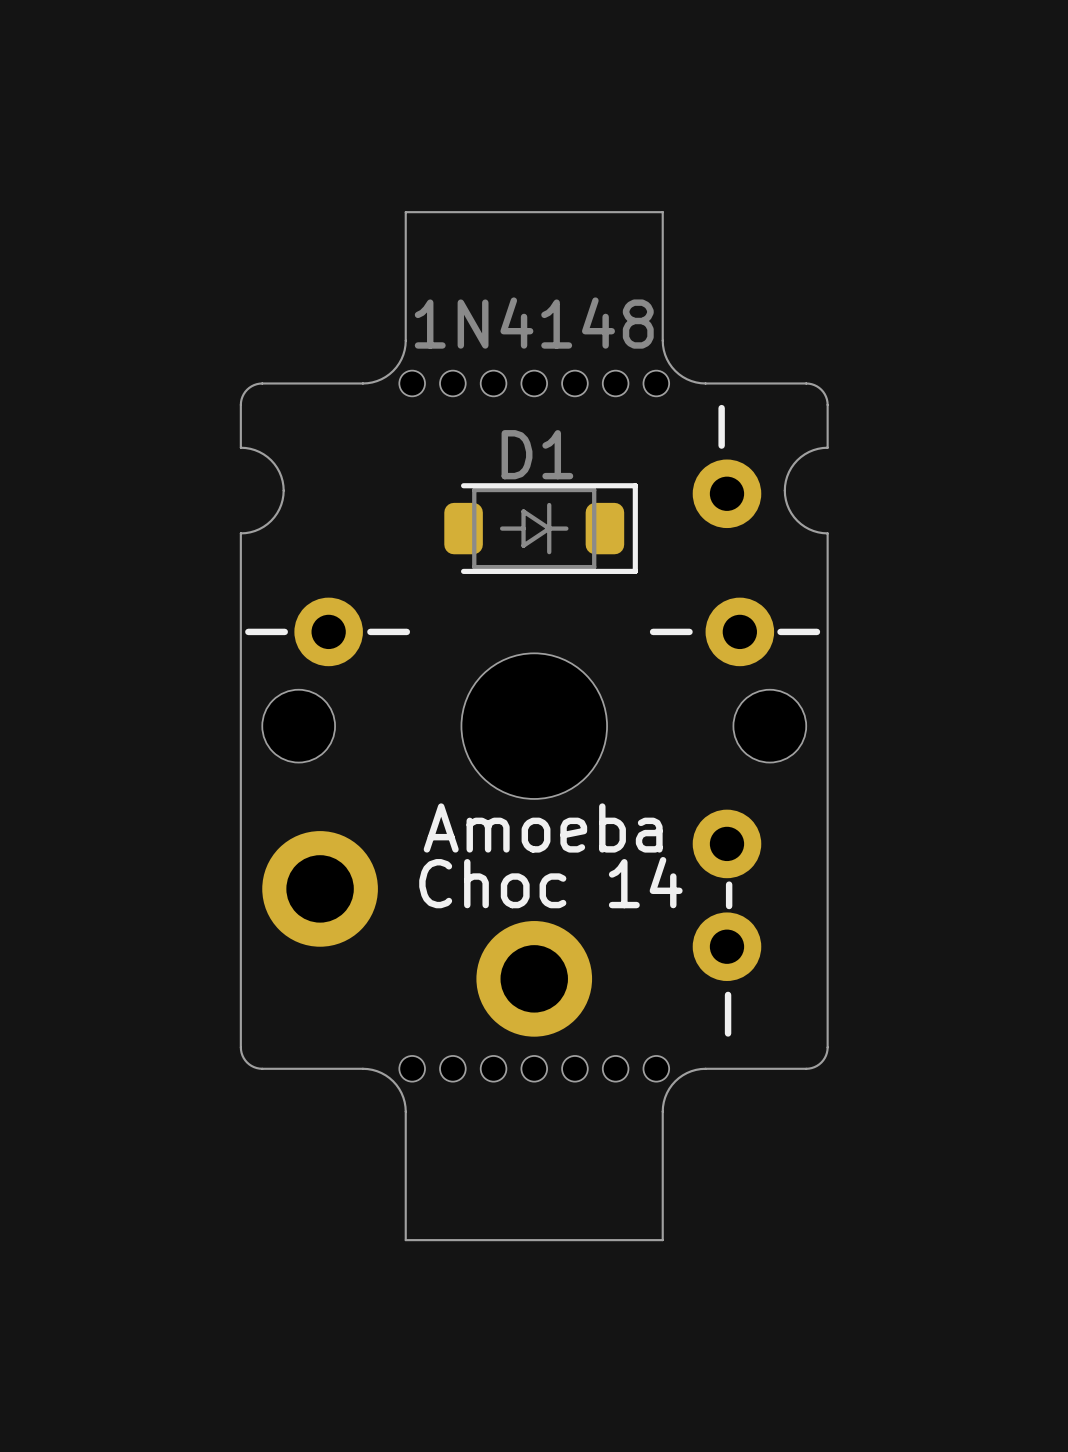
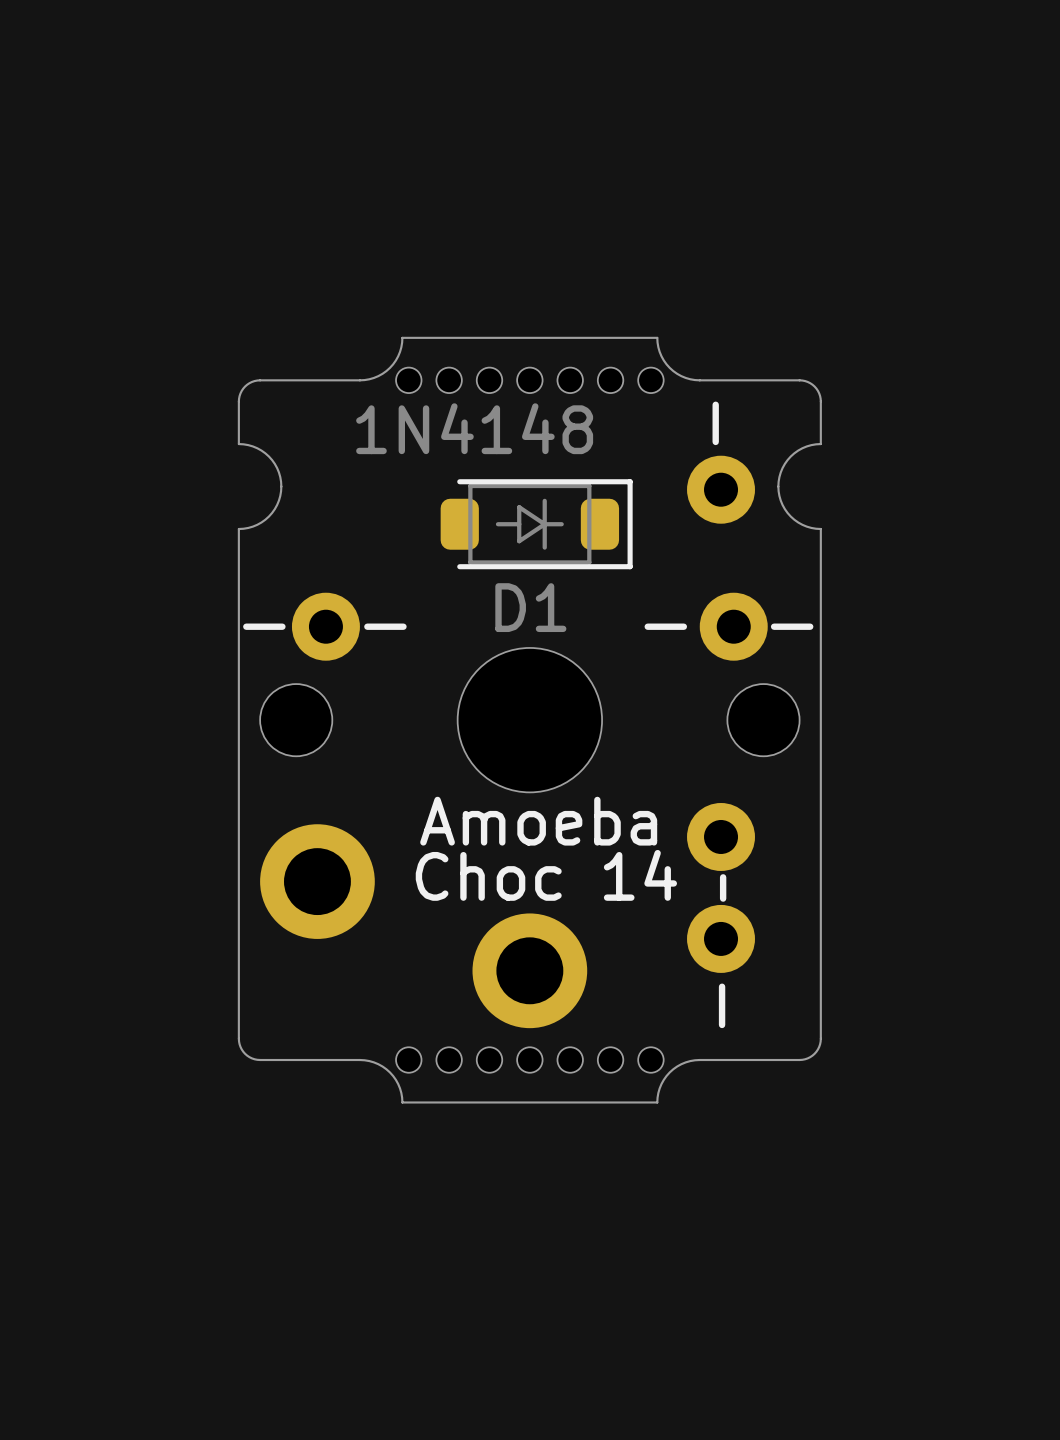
D1 value position: 1N4148 (534, 323) -> 1N4148 (474, 428)
board edge: (405, 340) (405, 212) (662, 212) (662, 340) -> (402, 337) (657, 337)
D1 name position: D1 (537, 454) -> D1 (530, 607)
board edge: (405, 1111) (405, 1240) (662, 1240) (662, 1111) -> (402, 1102) (657, 1102)

